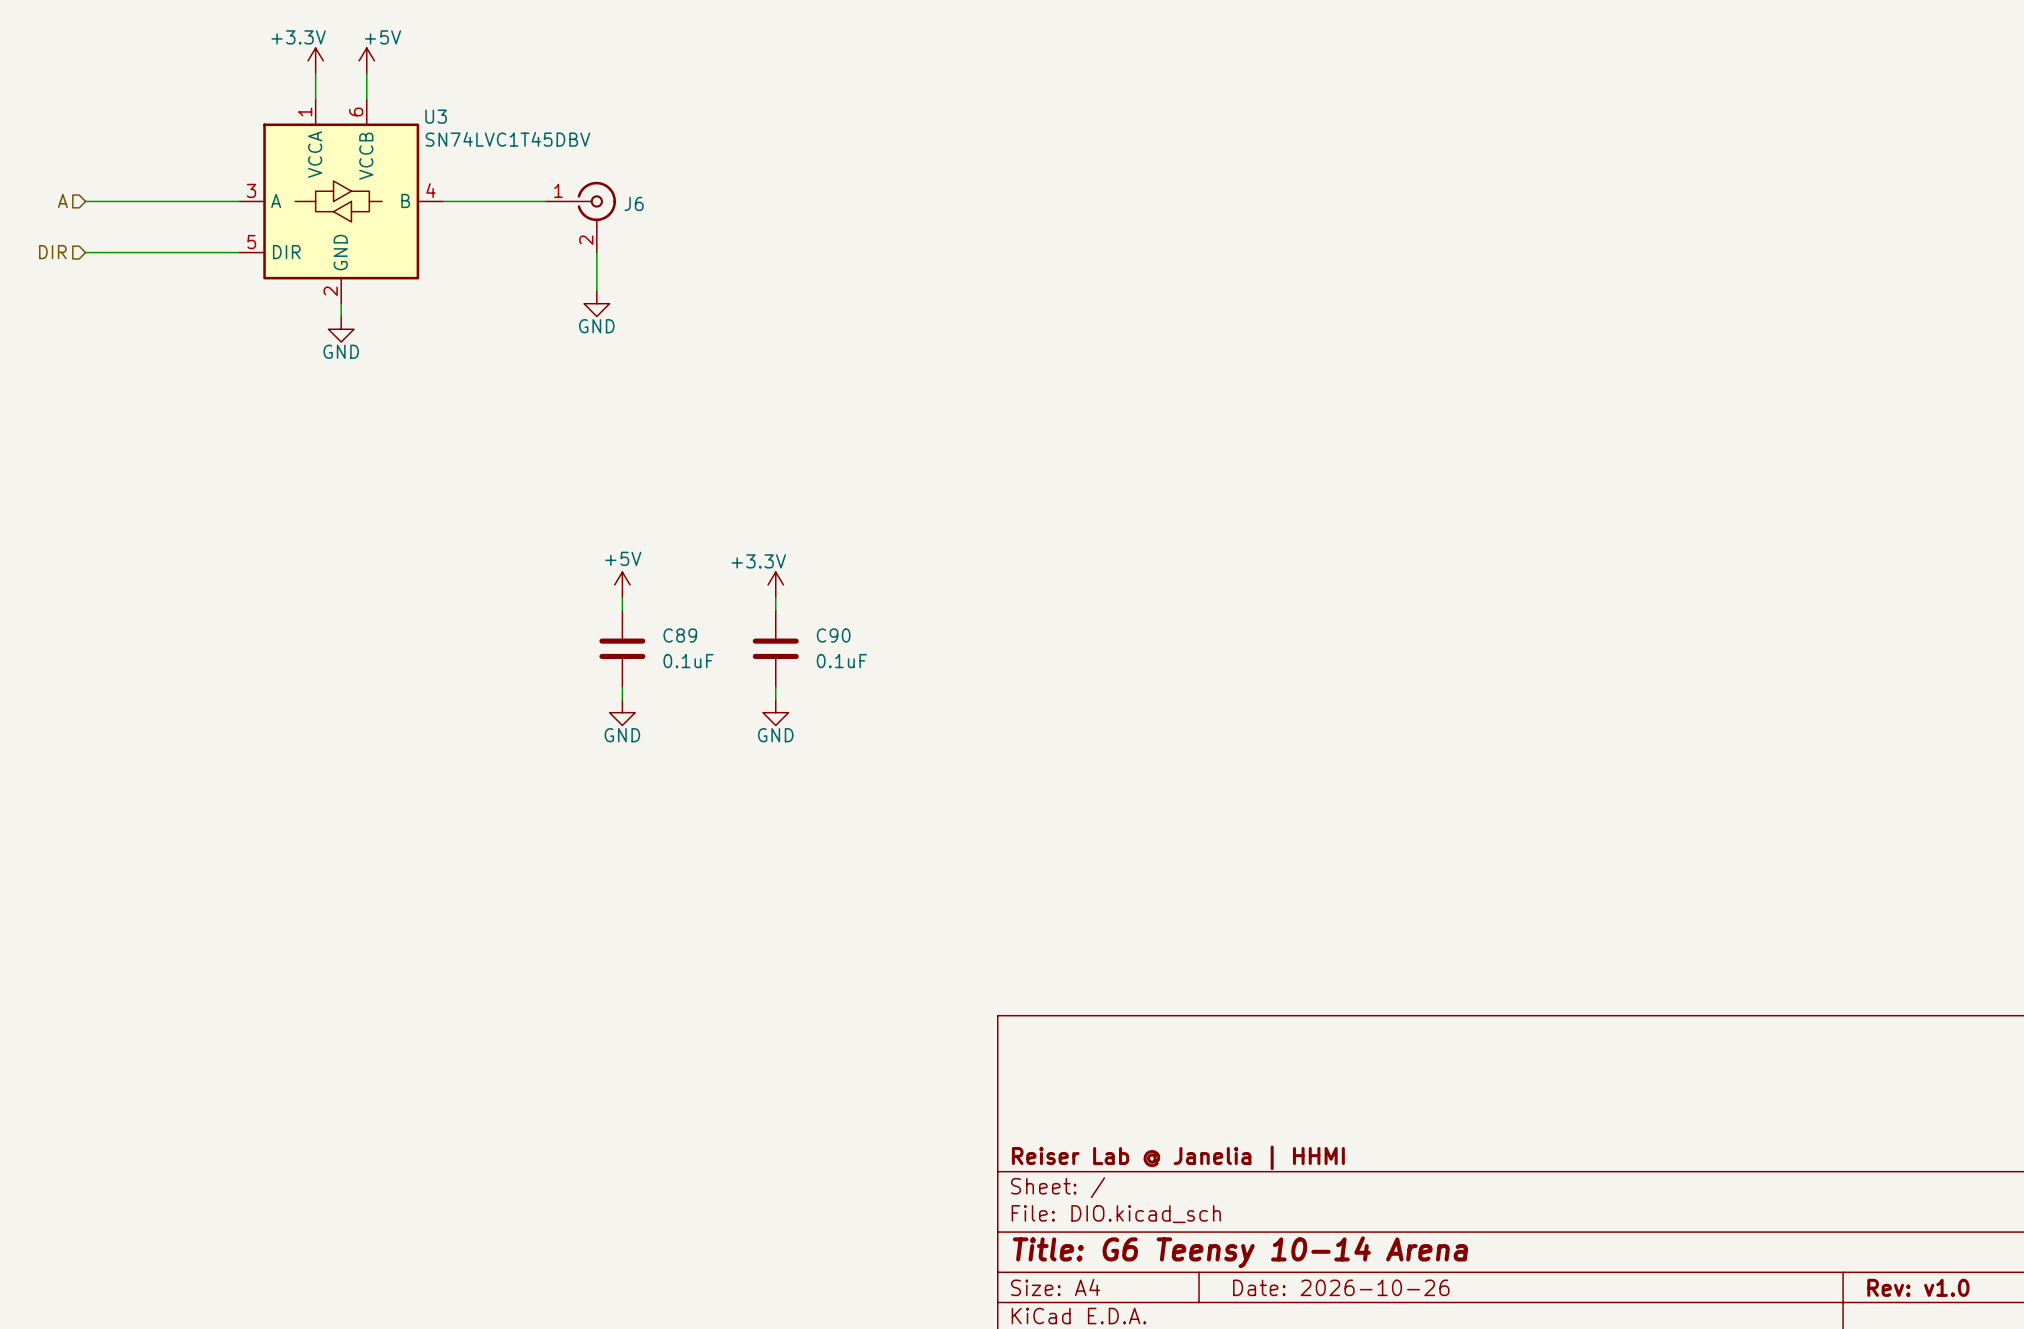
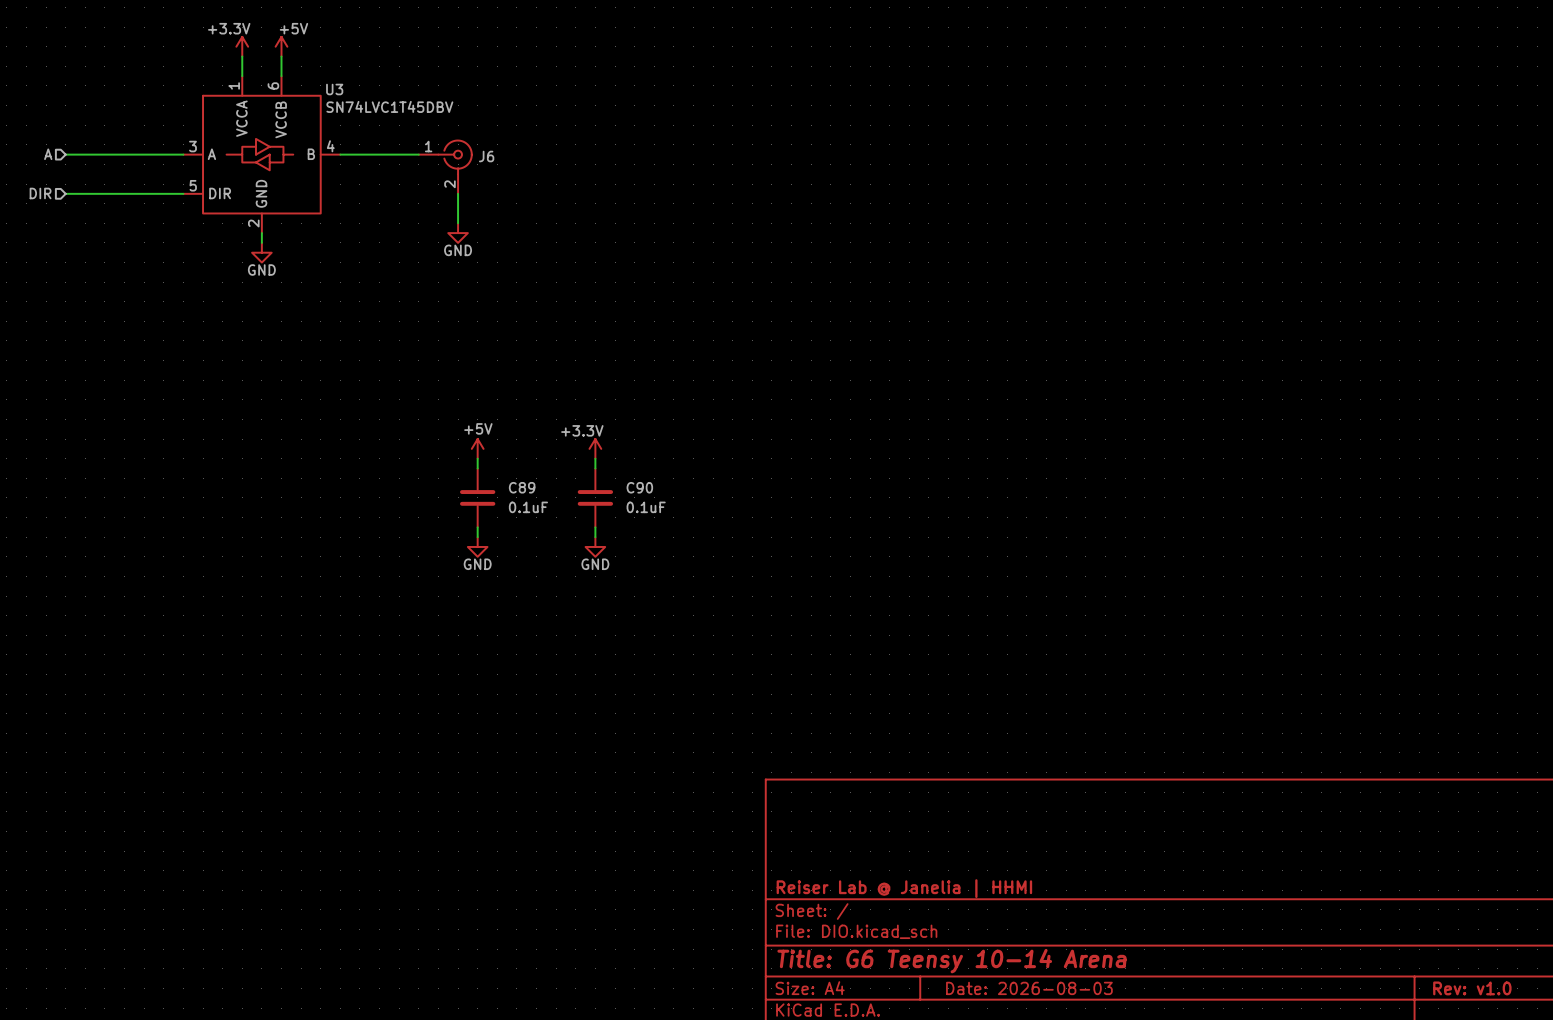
title block: Date: 2026-10-26 (1341, 1287) -> Date: 2026-08-03 (1029, 988)

